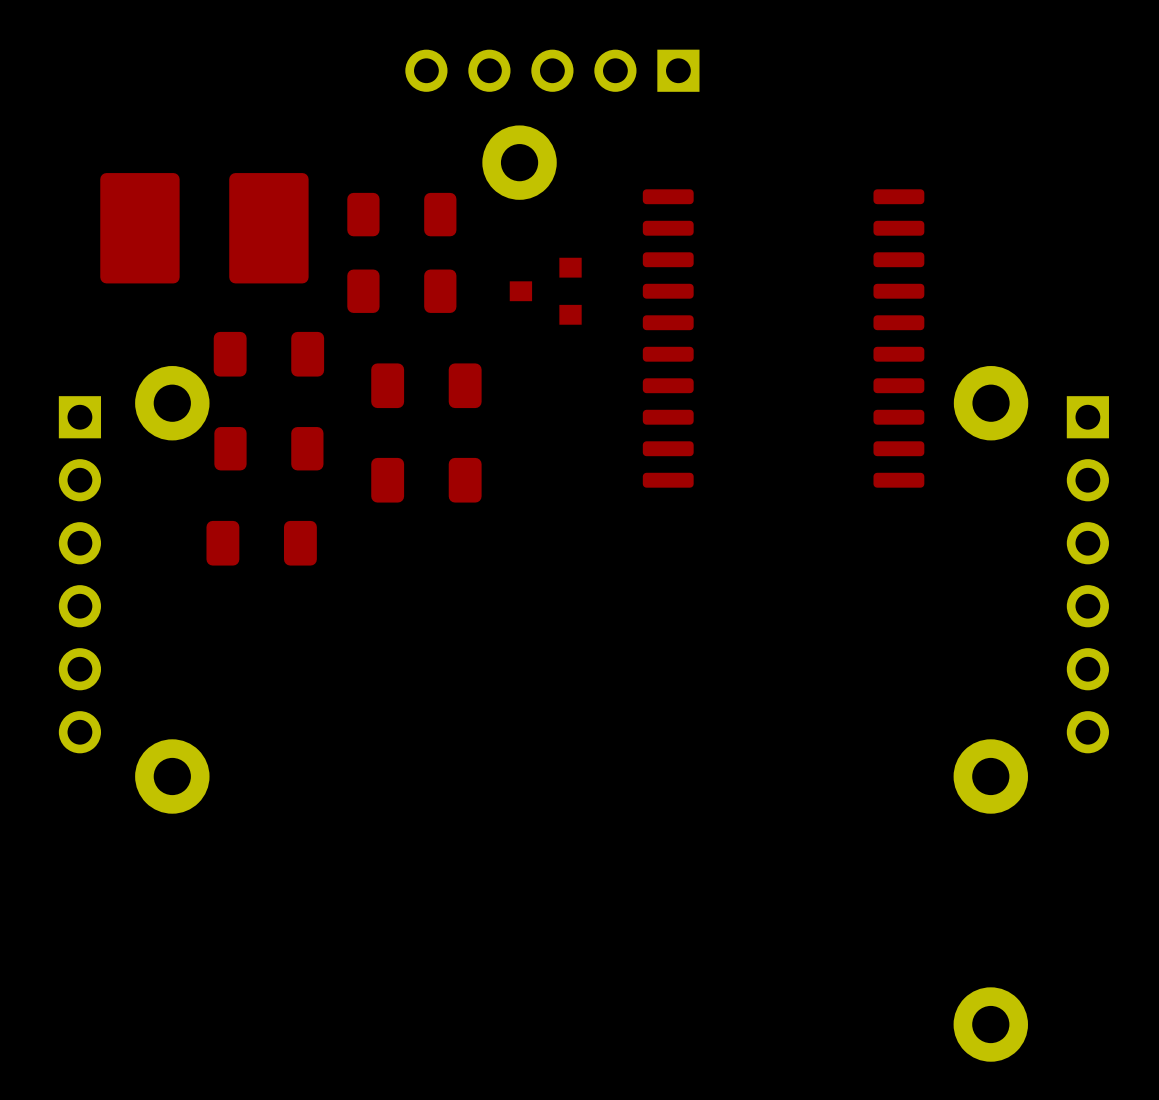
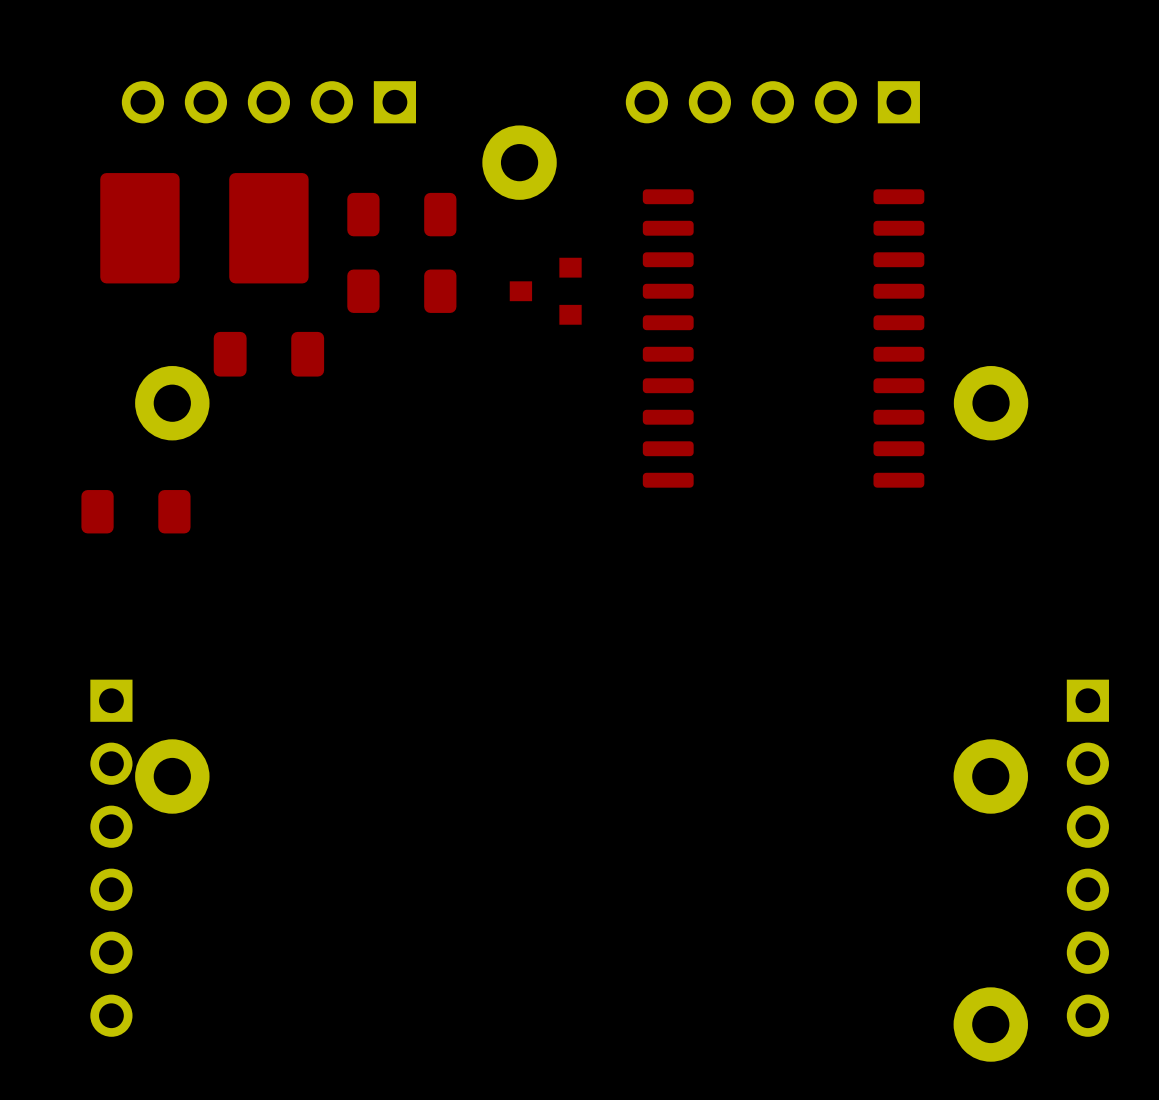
part: (552, 70) -> none
part: none -> (268, 102)
part: none -> (772, 102)
part: (426, 385) -> none
part position: (268, 448) -> (135, 511)
part: (426, 480) -> none
part: (261, 543) -> none
part position: (79, 574) -> (111, 858)
part position: (1087, 574) -> (1087, 858)

